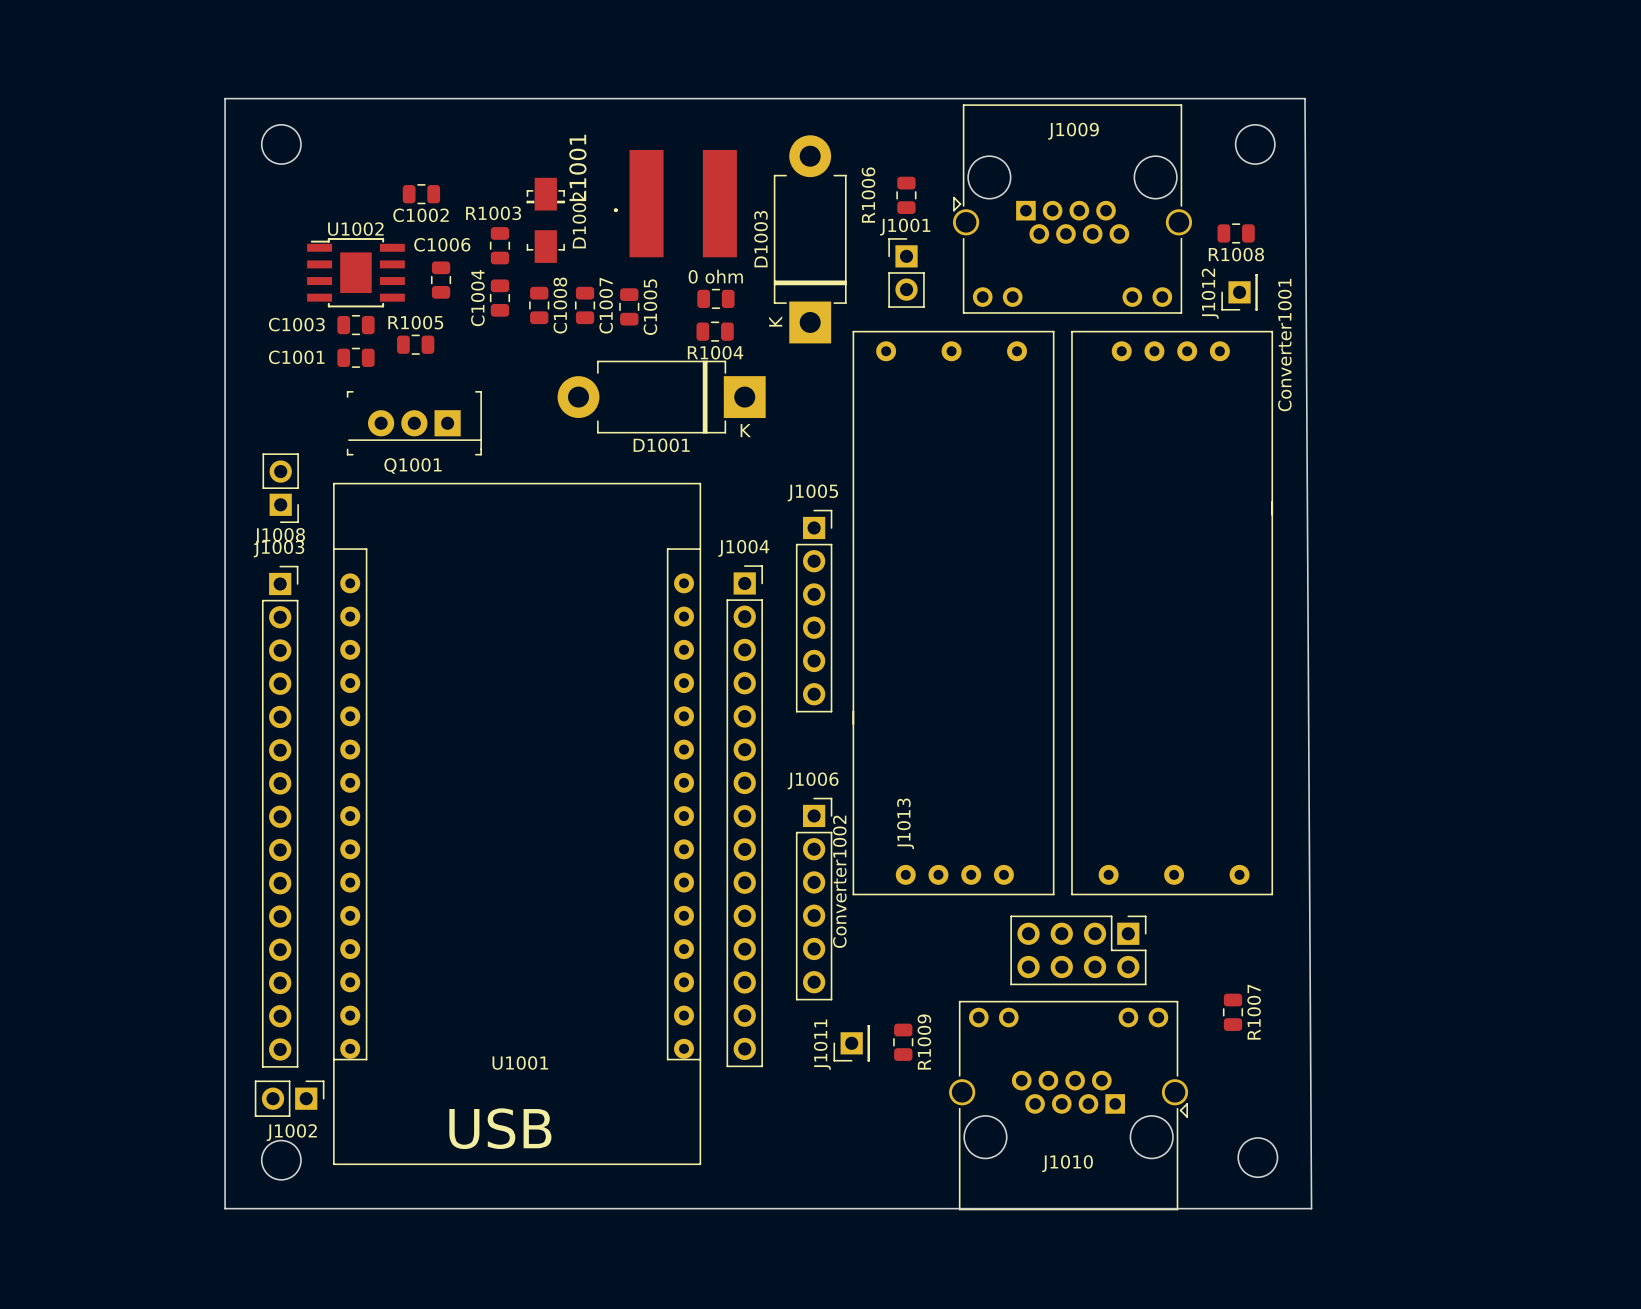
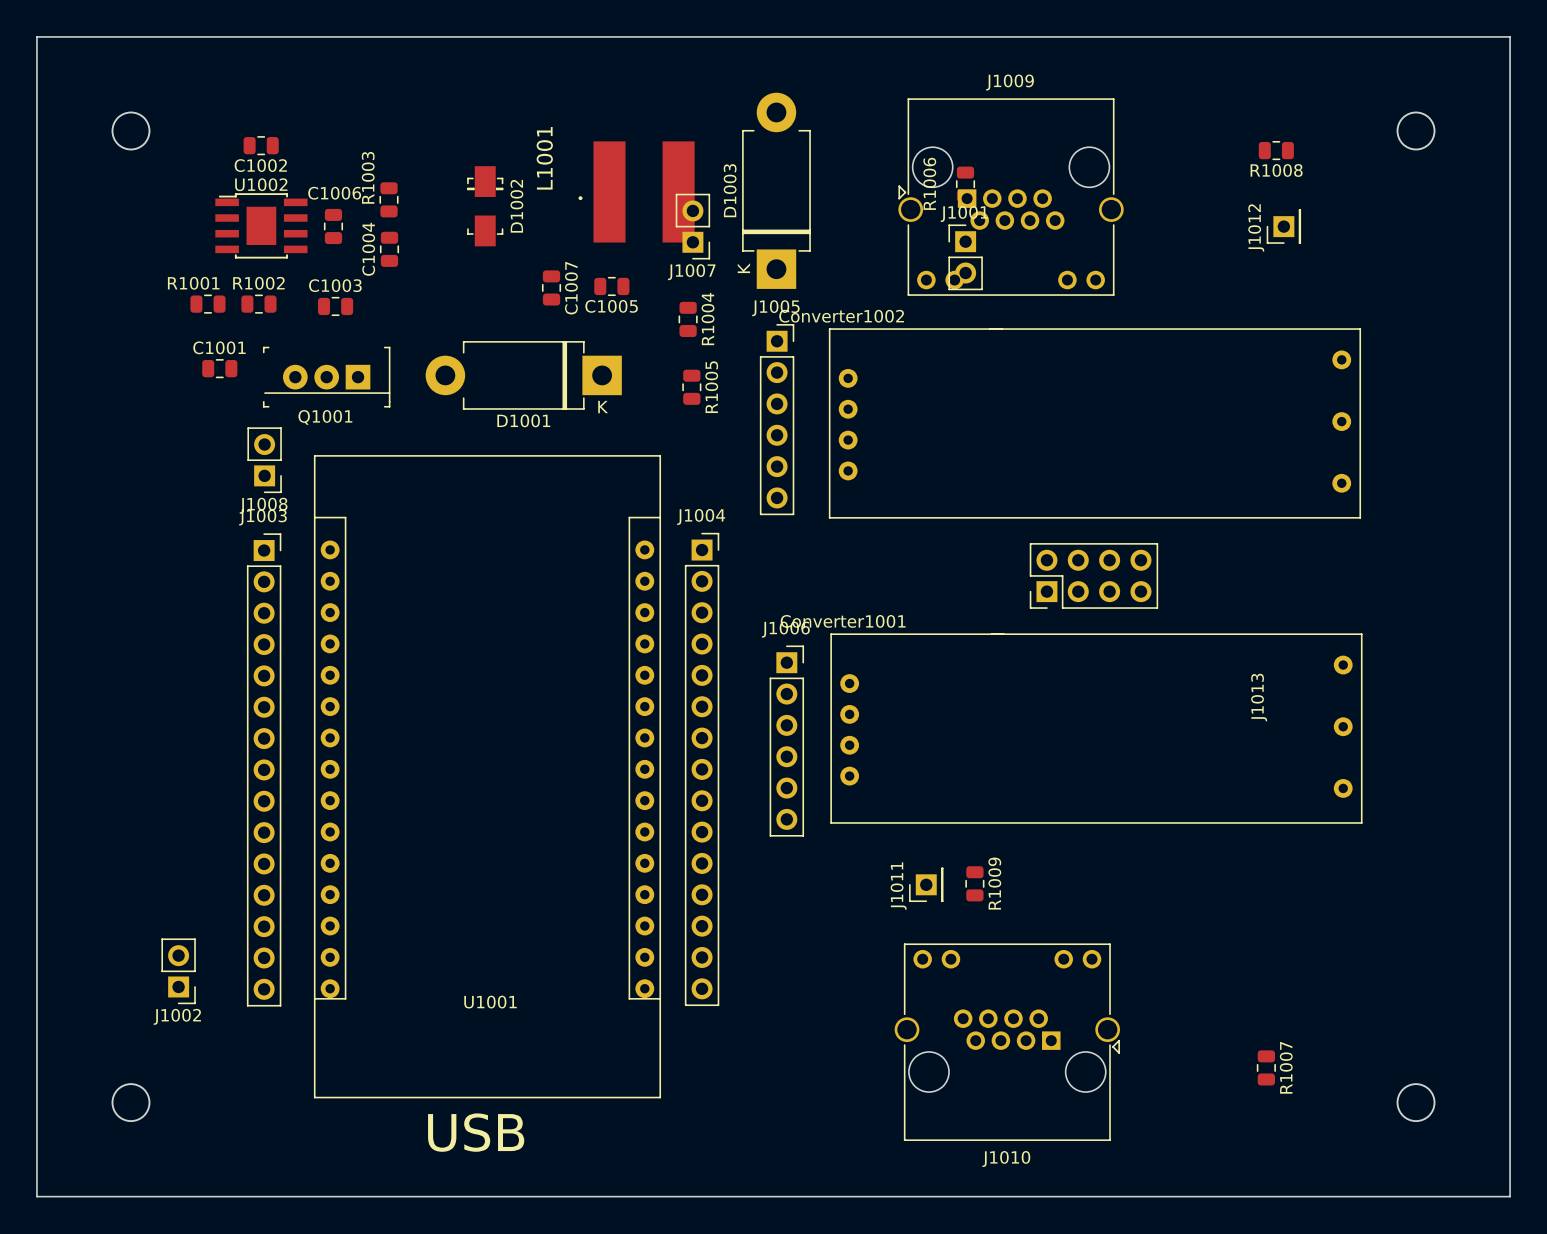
board edge: (225, 98) (225, 1208) (1311, 1208) (1304, 98) (225, 98) -> (36, 36) (36, 1196) (1510, 1196) (1510, 36) (36, 36)
round board edge: none -> [111, 111, 151, 151]
round board edge: none -> [1396, 111, 1436, 151]
round board edge: [261, 124, 302, 165] -> none
round board edge: [1234, 124, 1276, 165] -> none
J1009 name position: J1009 (1073, 131) -> J1009 (1010, 82)
C1002 position: (421, 194) -> (261, 145)
R1006 position: (906, 195) -> (965, 184)
R1003 name rotation: 0° (493, 213) -> 90° counterclockwise (368, 177)
D1002 position: (545, 220) -> (485, 206)
R1008 position: (1236, 233) -> (1276, 150)
D1003 position: (810, 239) -> (776, 190)
J1007: none -> (692, 226)
R1003 position: (499, 245) -> (389, 199)
U1002 position: (355, 272) -> (261, 225)
J1001 position: (906, 272) -> (965, 257)
C1006 position: (441, 280) -> (333, 226)
J1012 position: (1239, 292) -> (1283, 226)
C1004 position: (499, 298) -> (389, 249)
0 ohm: (715, 298) -> none
C1008: (539, 305) -> none
C1005 rotation: 0° (629, 306) -> 90° clockwise (611, 286)
R1001: none -> (207, 304)
R1002: none -> (258, 304)
C1003 name position: C1003 (296, 324) -> C1003 (335, 285)
R1004 rotation: 0° (715, 331) -> 90° clockwise (688, 319)
R1005 rotation: 0° (415, 344) -> 90° clockwise (691, 387)
R1005 position: (415, 344) -> (691, 387)
R1004 name position: R1004 (715, 352) -> R1004 (708, 319)
C1001 name position: C1001 (296, 357) -> C1001 (219, 347)
C1001 position: (355, 357) -> (219, 368)
D1001 position: (661, 397) -> (523, 375)
Q1001 position: (414, 423) -> (326, 377)
J1005 position: (814, 611) -> (777, 419)
Converter1002 rotation: 0° (953, 613) -> 90° clockwise (1094, 423)
Converter1001 rotation: 0° (1172, 613) -> 90° counterclockwise (1096, 728)
J1006 position: (814, 899) -> (786, 741)
J1013 rotation: 0° (1078, 950) -> 180° (1093, 575)
J1013 position: (1078, 950) -> (1093, 575)
R1007 position: (1232, 1012) -> (1266, 1067)
R1009 position: (903, 1042) -> (974, 883)
J1011 position: (851, 1043) -> (926, 884)
J1002 rotation: 0° (289, 1098) -> 90° clockwise (178, 971)
J1002 position: (289, 1098) -> (178, 971)
text position: USB (500, 1128) -> USB (476, 1132)
round board edge: [1237, 1137, 1279, 1178] -> none
round board edge: [261, 1139, 302, 1181] -> none
round board edge: none -> [111, 1083, 151, 1123]
round board edge: none -> [1396, 1083, 1436, 1123]
J1010 name position: J1010 (1067, 1163) -> J1010 (1006, 1159)

